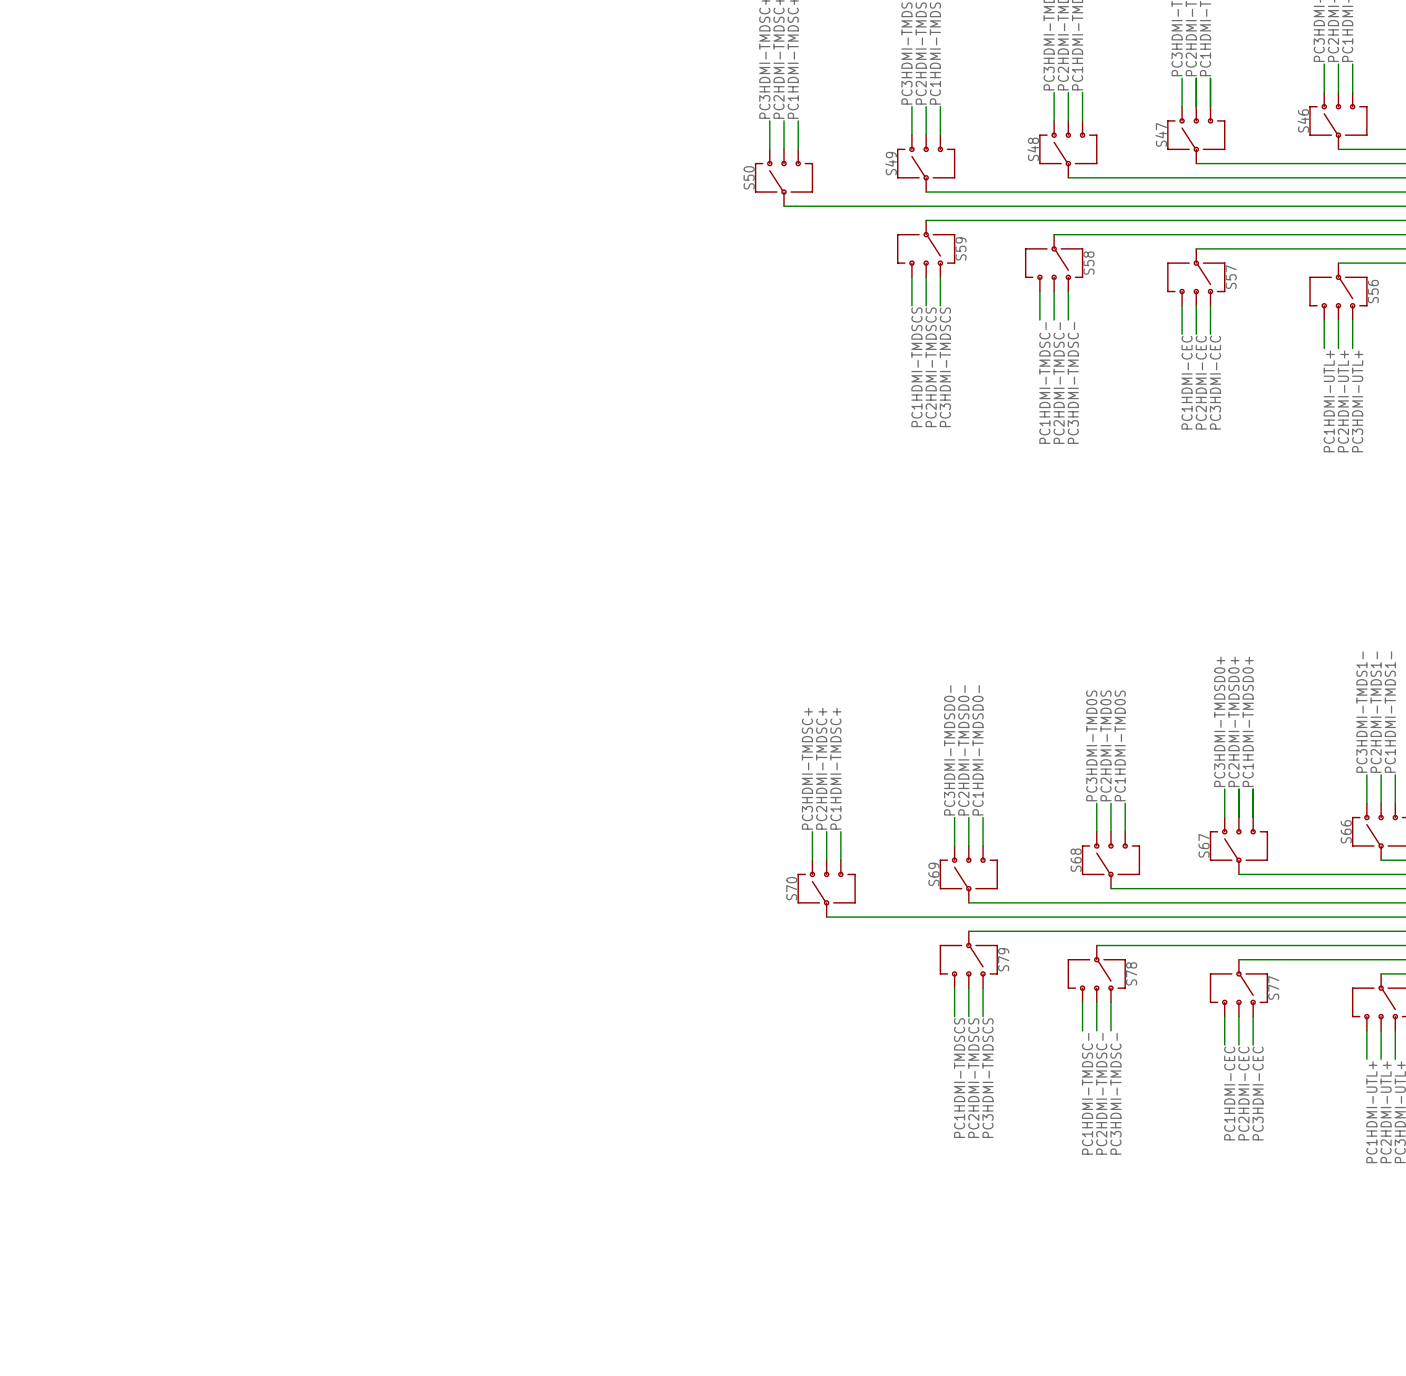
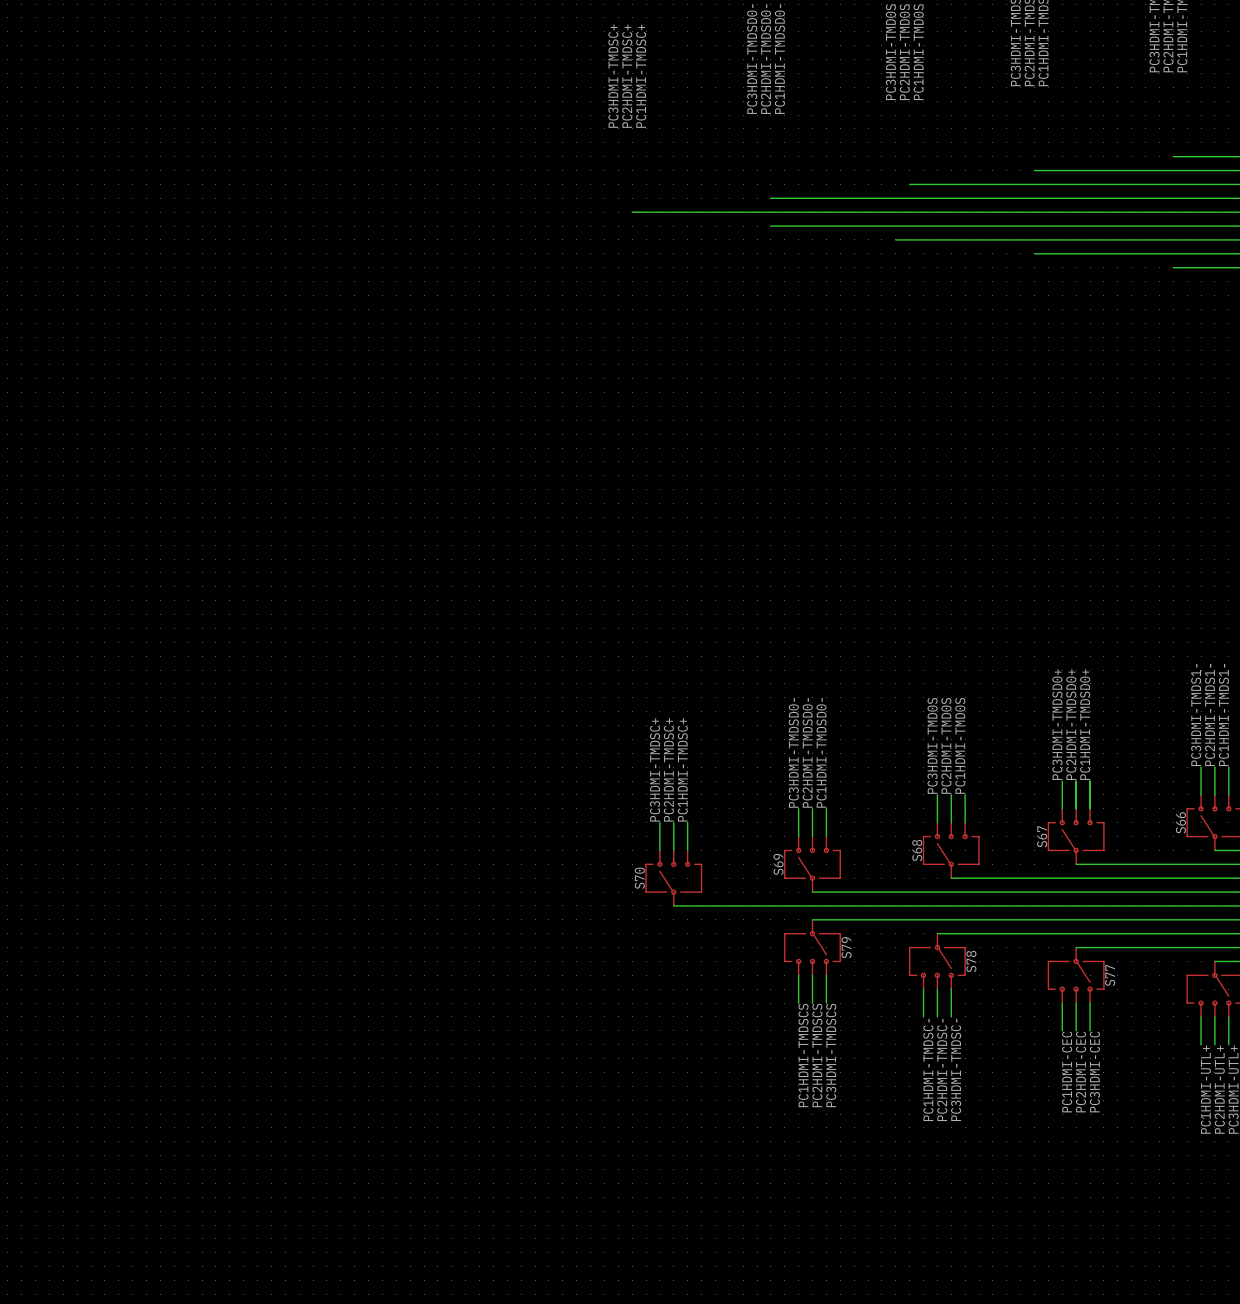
wire: (1324, 64) (1324, 92) -> none
wire: (1338, 64) (1338, 92) -> none
wire: (1352, 64) (1352, 92) -> none
wire: (1182, 78) (1182, 106) -> none
wire: (1196, 78) (1196, 106) -> none
wire: (1210, 78) (1210, 106) -> none
wire: (1054, 92) (1054, 120) -> none
wire: (1068, 92) (1068, 120) -> none
wire: (1082, 92) (1082, 120) -> none
wire: (911, 106) (911, 135) -> none
wire: (926, 106) (926, 135) -> none
wire: (940, 106) (940, 135) -> none
wire: (769, 120) (769, 149) -> none
wire: (783, 120) (783, 149) -> none
wire: (798, 120) (798, 149) -> none
S46: (1338, 120) -> none
S47: (1196, 135) -> none
S48: (1068, 149) -> none
S49: (926, 163) -> none
S50: (783, 177) -> none
S59: (926, 248) -> none
S58: (1054, 263) -> none
wire: (911, 277) (911, 305) -> none
wire: (926, 277) (926, 305) -> none
wire: (940, 277) (940, 305) -> none
S57: (1196, 277) -> none
wire: (1039, 291) (1039, 319) -> none
wire: (1054, 291) (1054, 319) -> none
wire: (1068, 291) (1068, 319) -> none
S56: (1338, 291) -> none
wire: (1182, 305) (1182, 334) -> none
wire: (1196, 305) (1196, 334) -> none
wire: (1210, 305) (1210, 334) -> none
wire: (1324, 319) (1324, 348) -> none
wire: (1338, 319) (1338, 348) -> none
wire: (1352, 319) (1352, 348) -> none
label: PC1HDMI-TMDSCS (916, 367) -> none
label: PC2HDMI-TMDSCS (931, 367) -> none
label: PC3HDMI-TMDSCS (945, 367) -> none
label: PC1HDMI-TMDSC- (1044, 382) -> none
label: PC2HDMI-TMDSC- (1059, 382) -> none
label: PC3HDMI-TMDSC- (1073, 382) -> none
label: PC1HDMI-CEC (1187, 382) -> none
label: PC2HDMI-CEC (1201, 382) -> none
label: PC3HDMI-CEC (1215, 382) -> none
label: PC1HDMI-UTL+ (1329, 401) -> none
label: PC2HDMI-UTL+ (1343, 401) -> none
label: PC3HDMI-UTL+ (1357, 401) -> none

